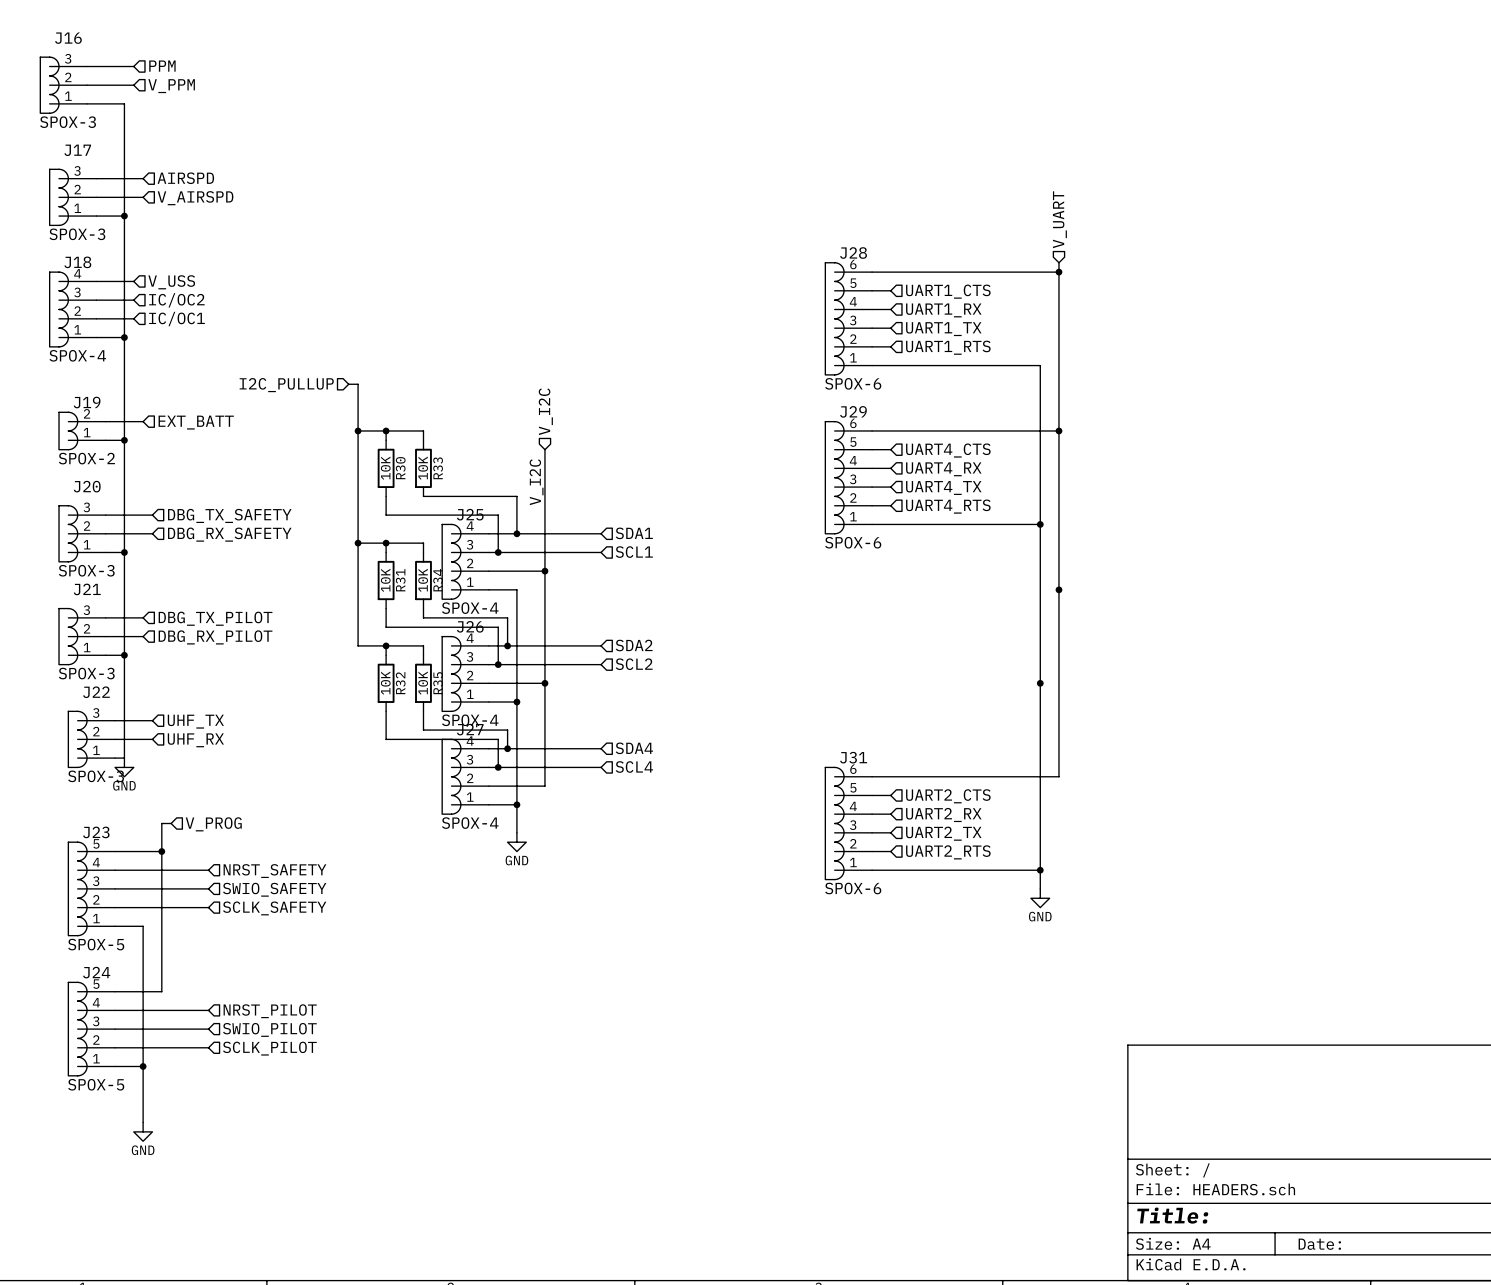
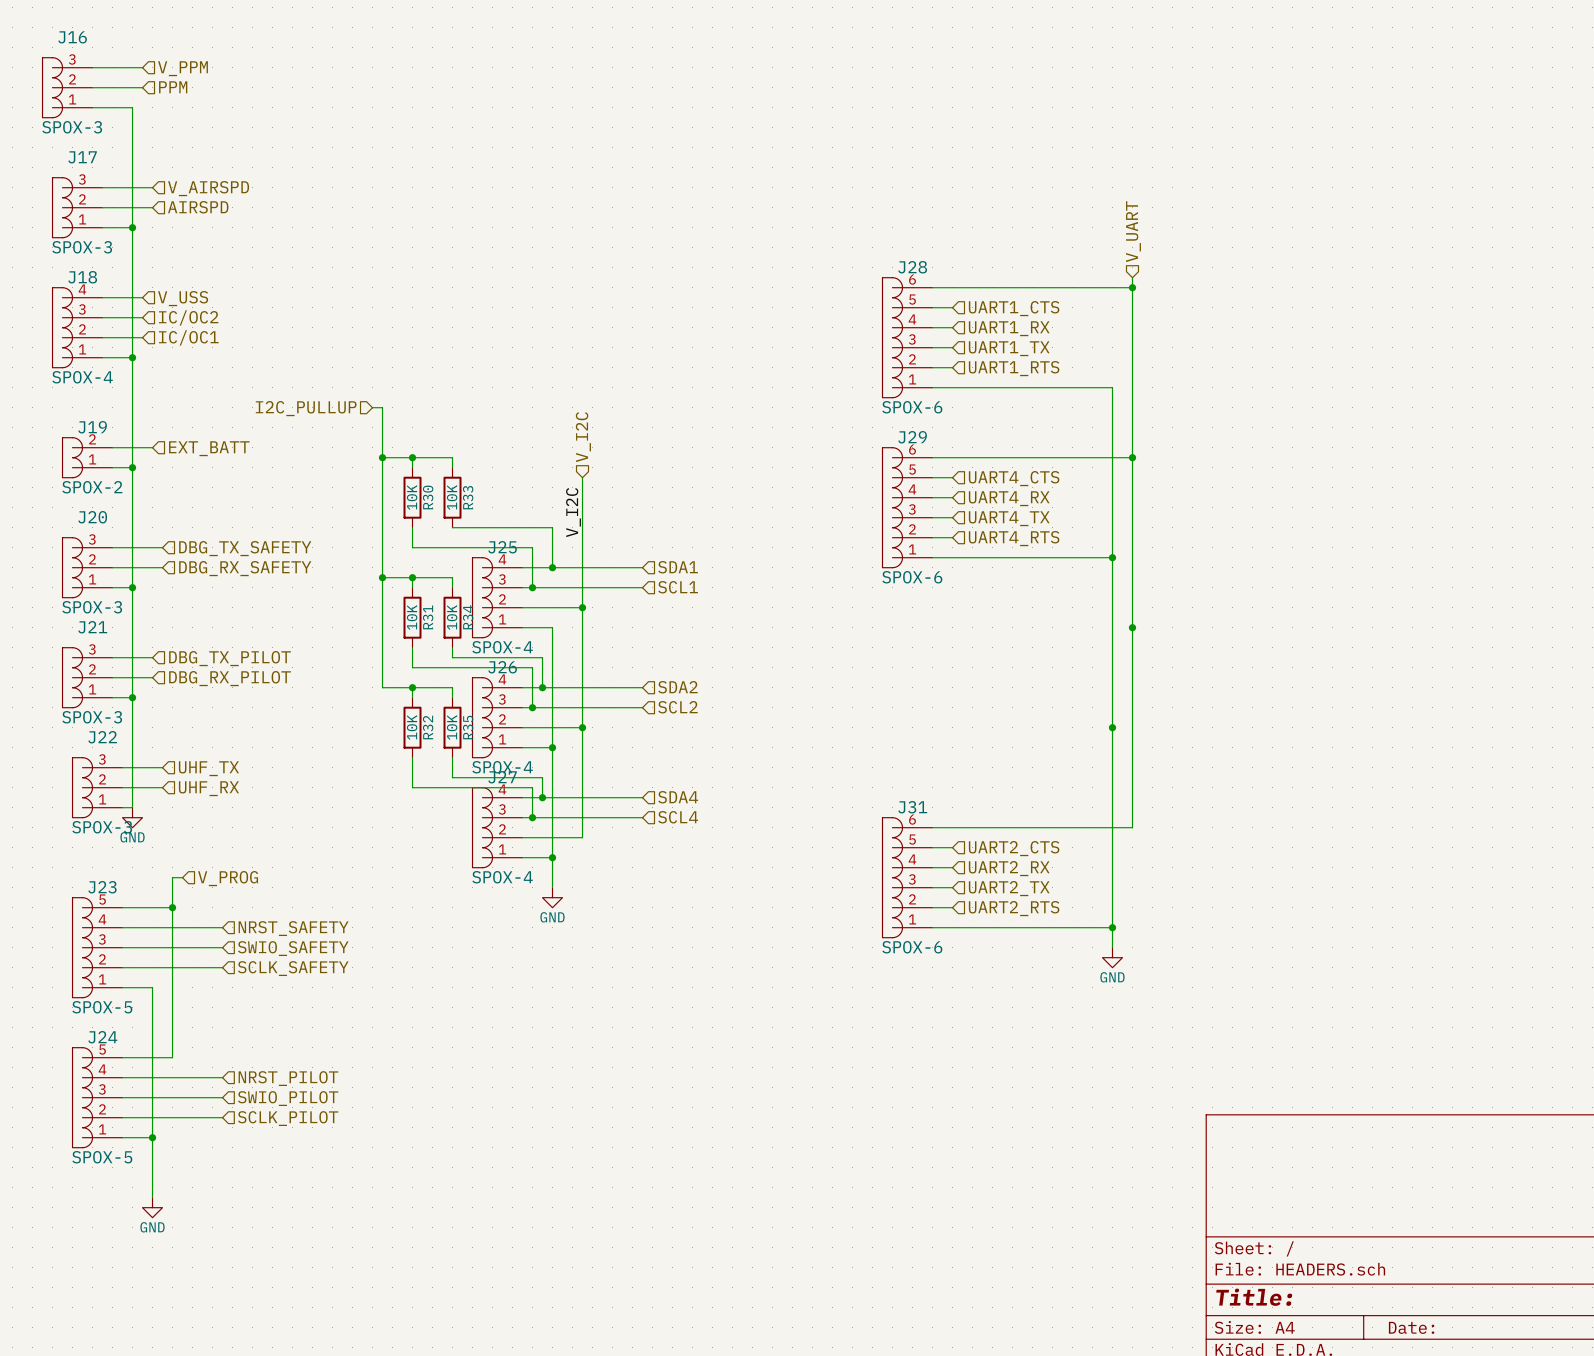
hierarchical label: PPM (162, 66) -> V_PPM (183, 68)
hierarchical label: V_PPM (171, 86) -> PPM (173, 87)
hierarchical label: AIRSPD (185, 178) -> V_AIRSPD (208, 188)
hierarchical label: V_AIRSPD (195, 198) -> AIRSPD (198, 207)

